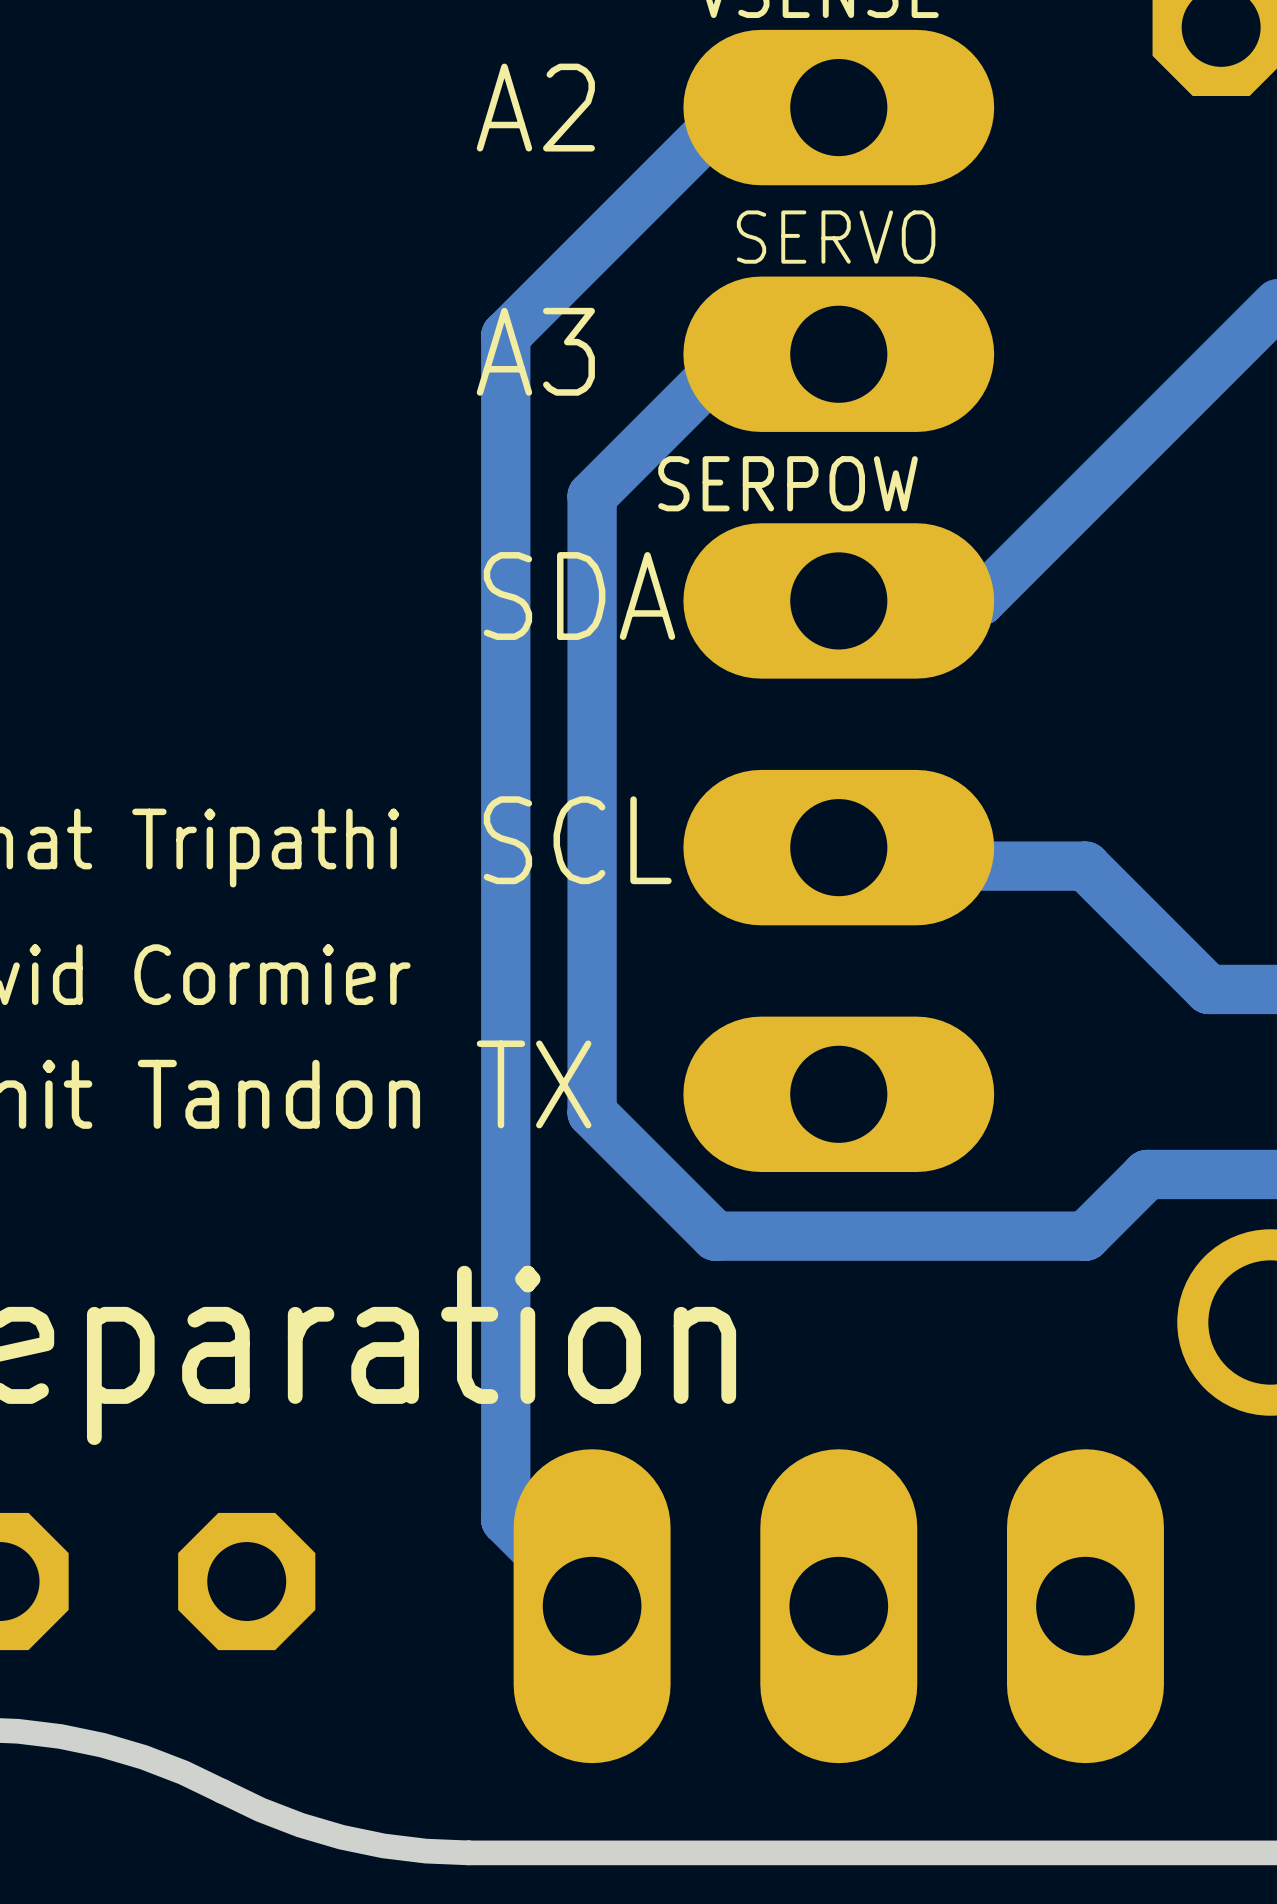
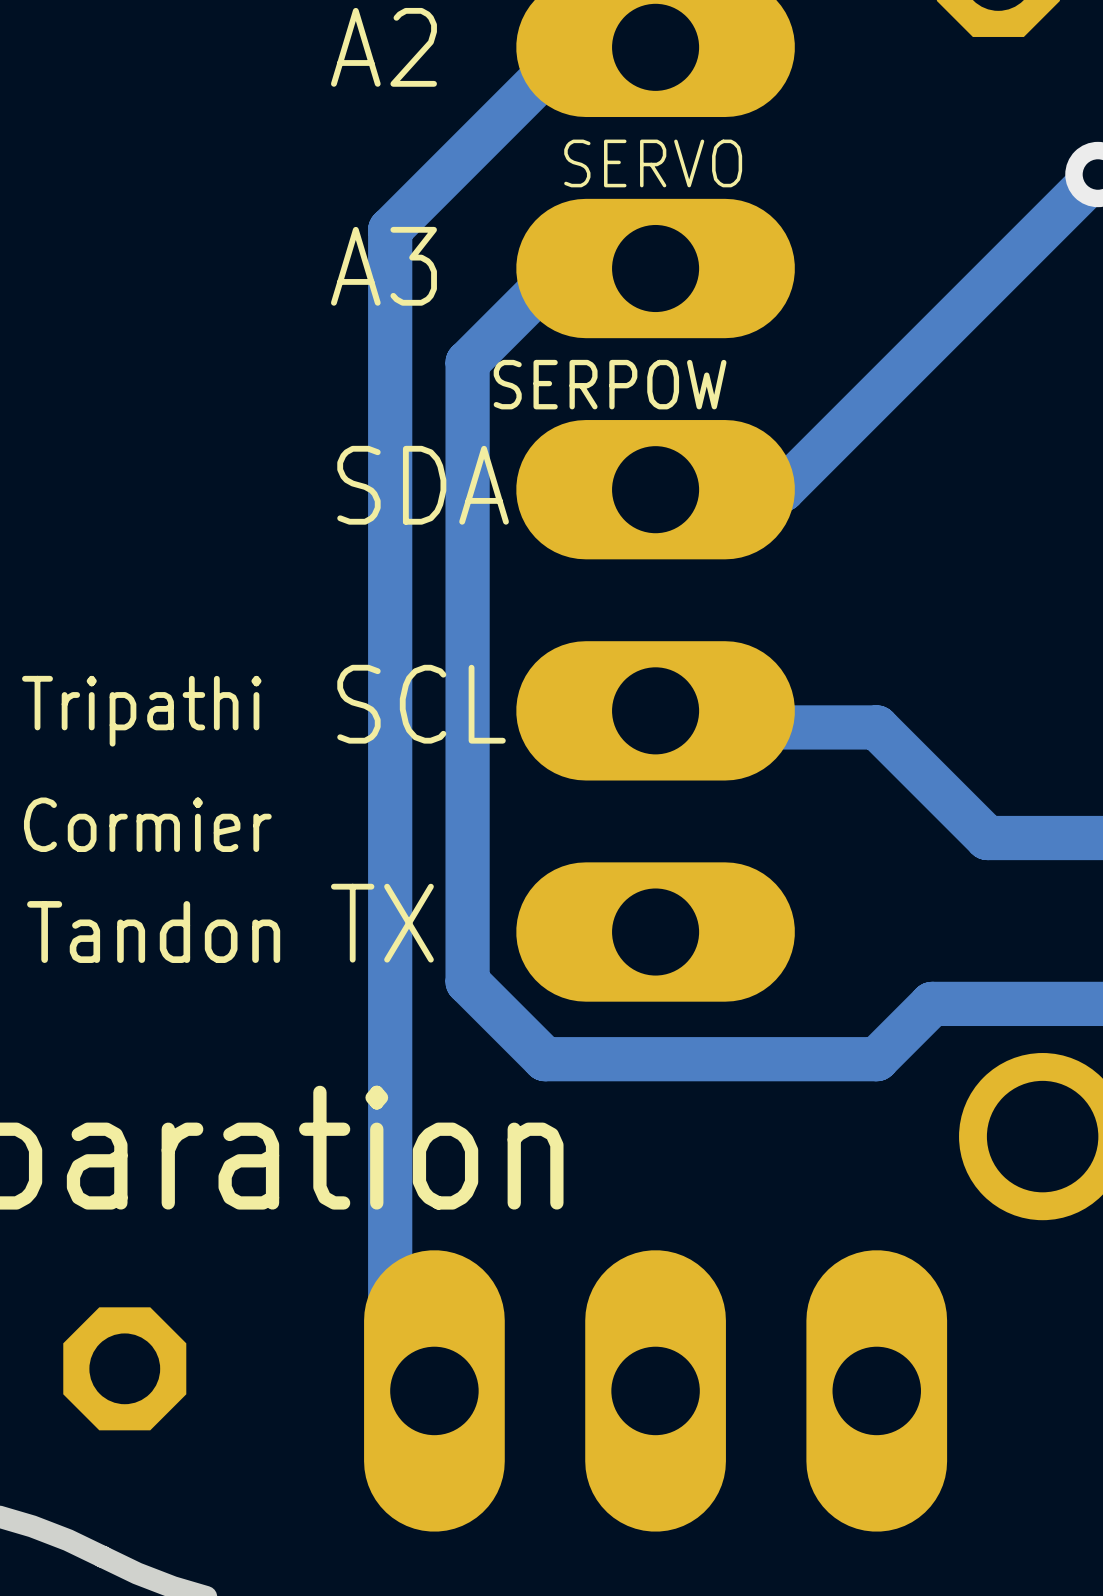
track: (746, 107) (733, 107) (505, 335) (505, 1519) (542, 1556) -> (572, 47) (390, 229) (390, 1346)
track: (629, 459) (592, 496) (592, 1112) (629, 1149) -> (467, 362) (467, 981)

